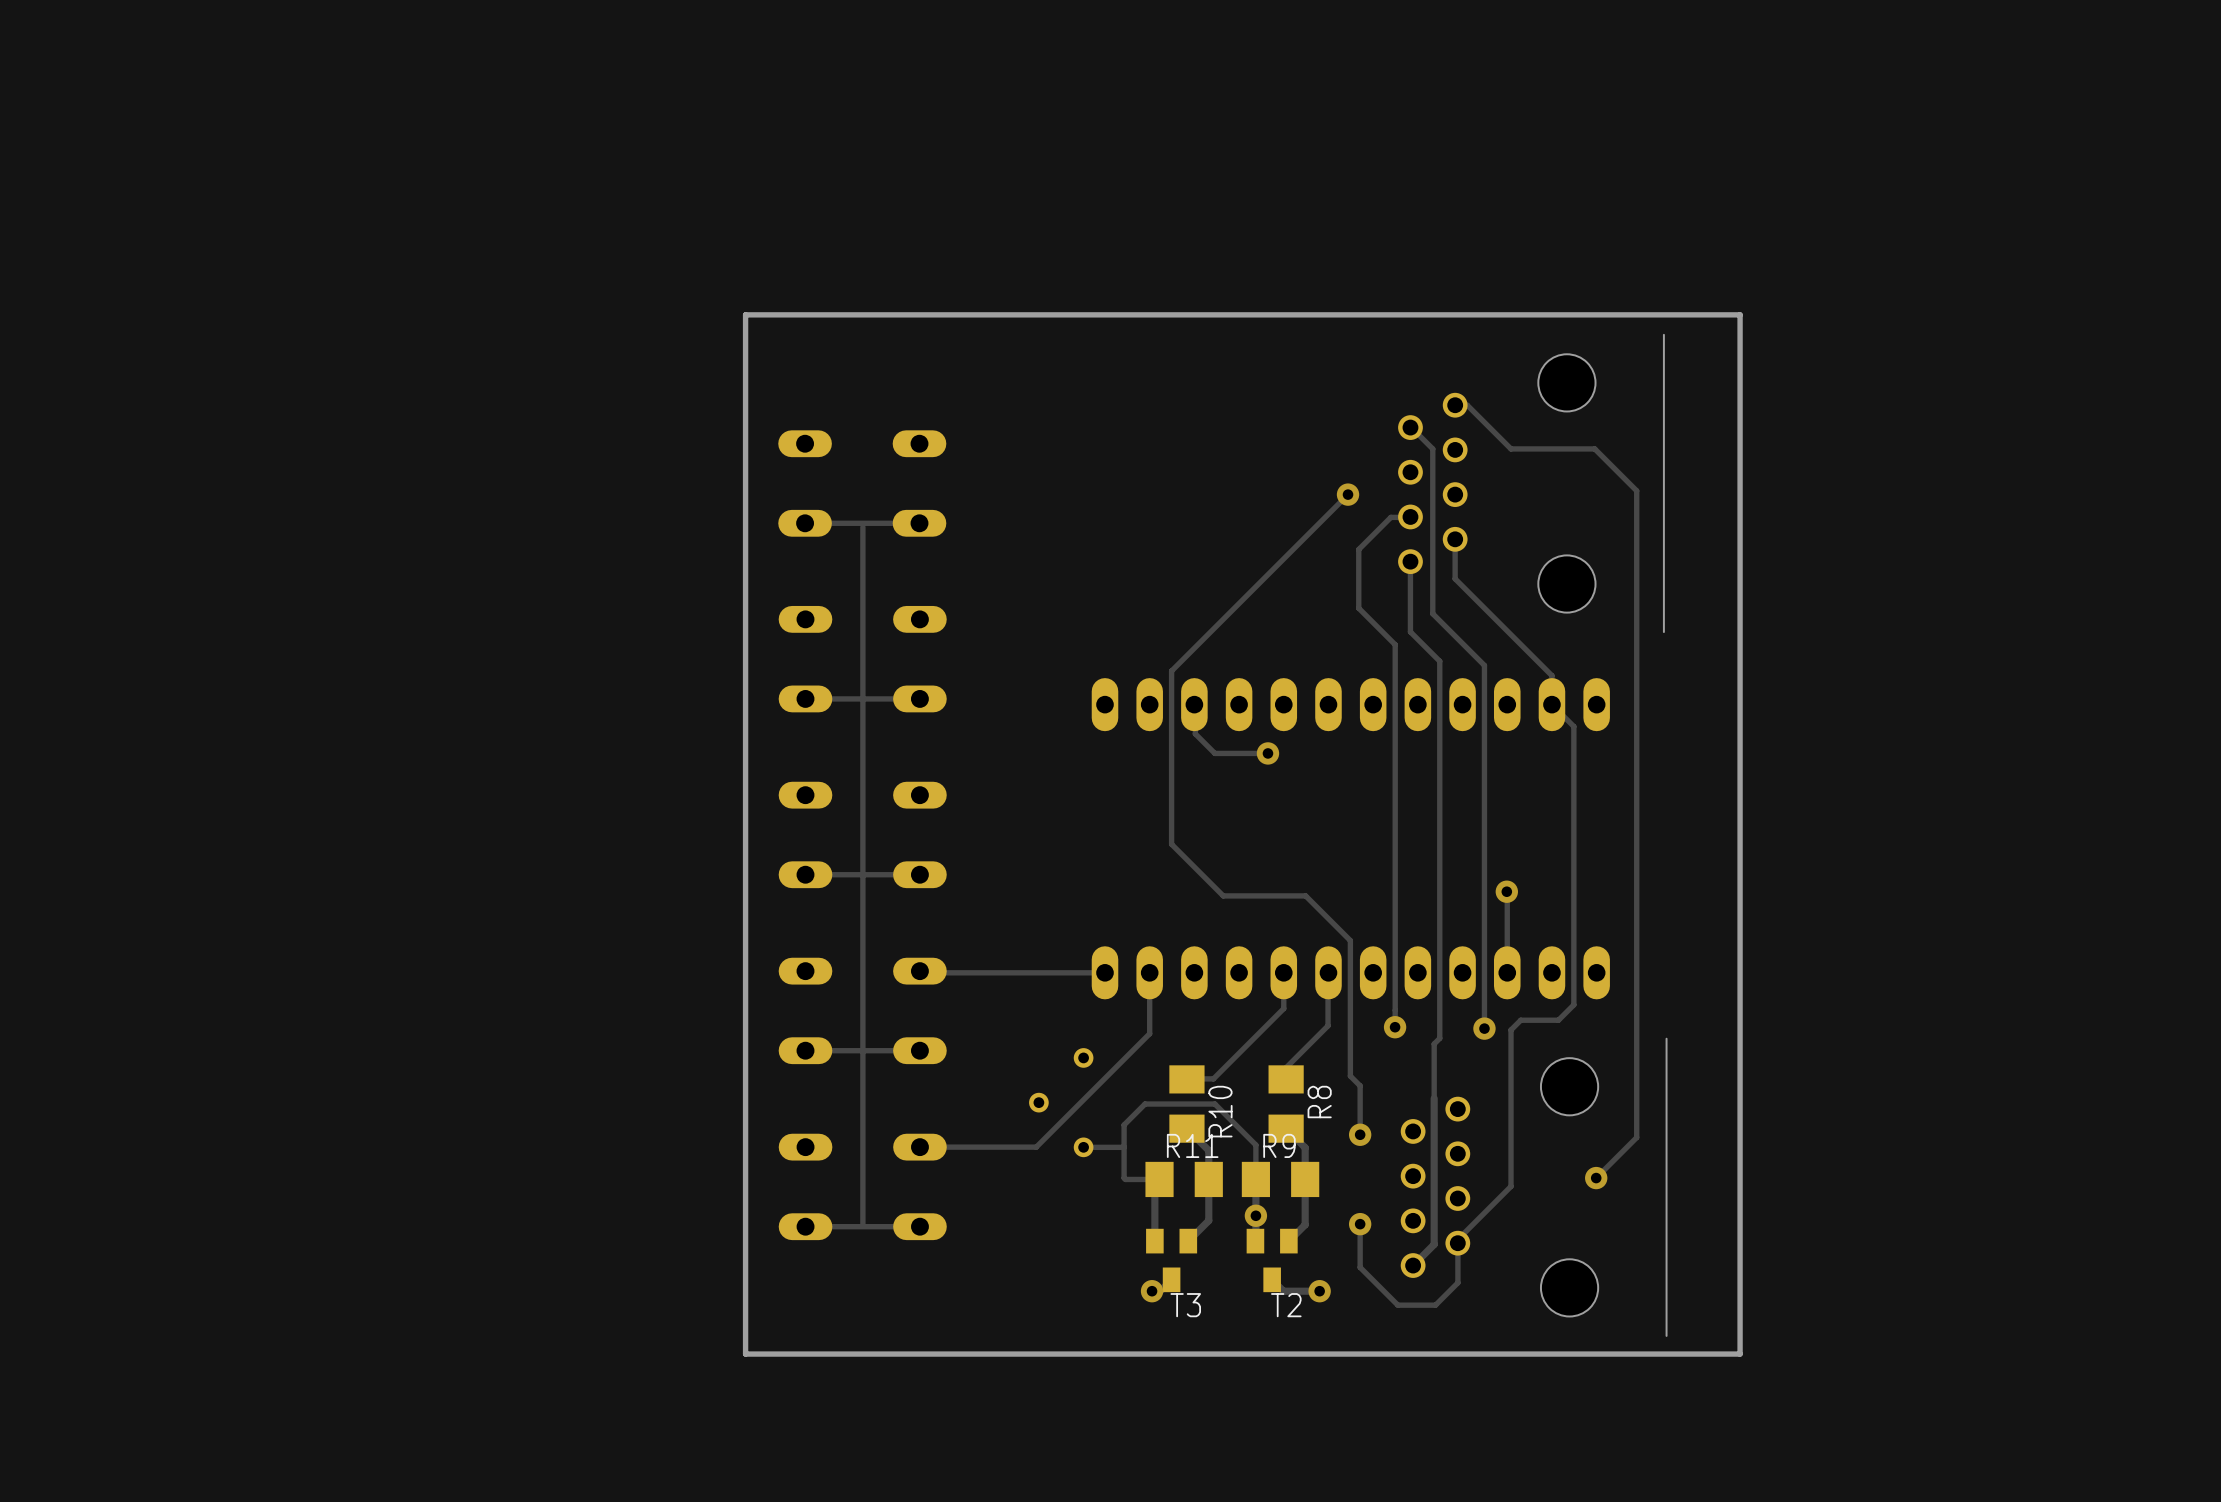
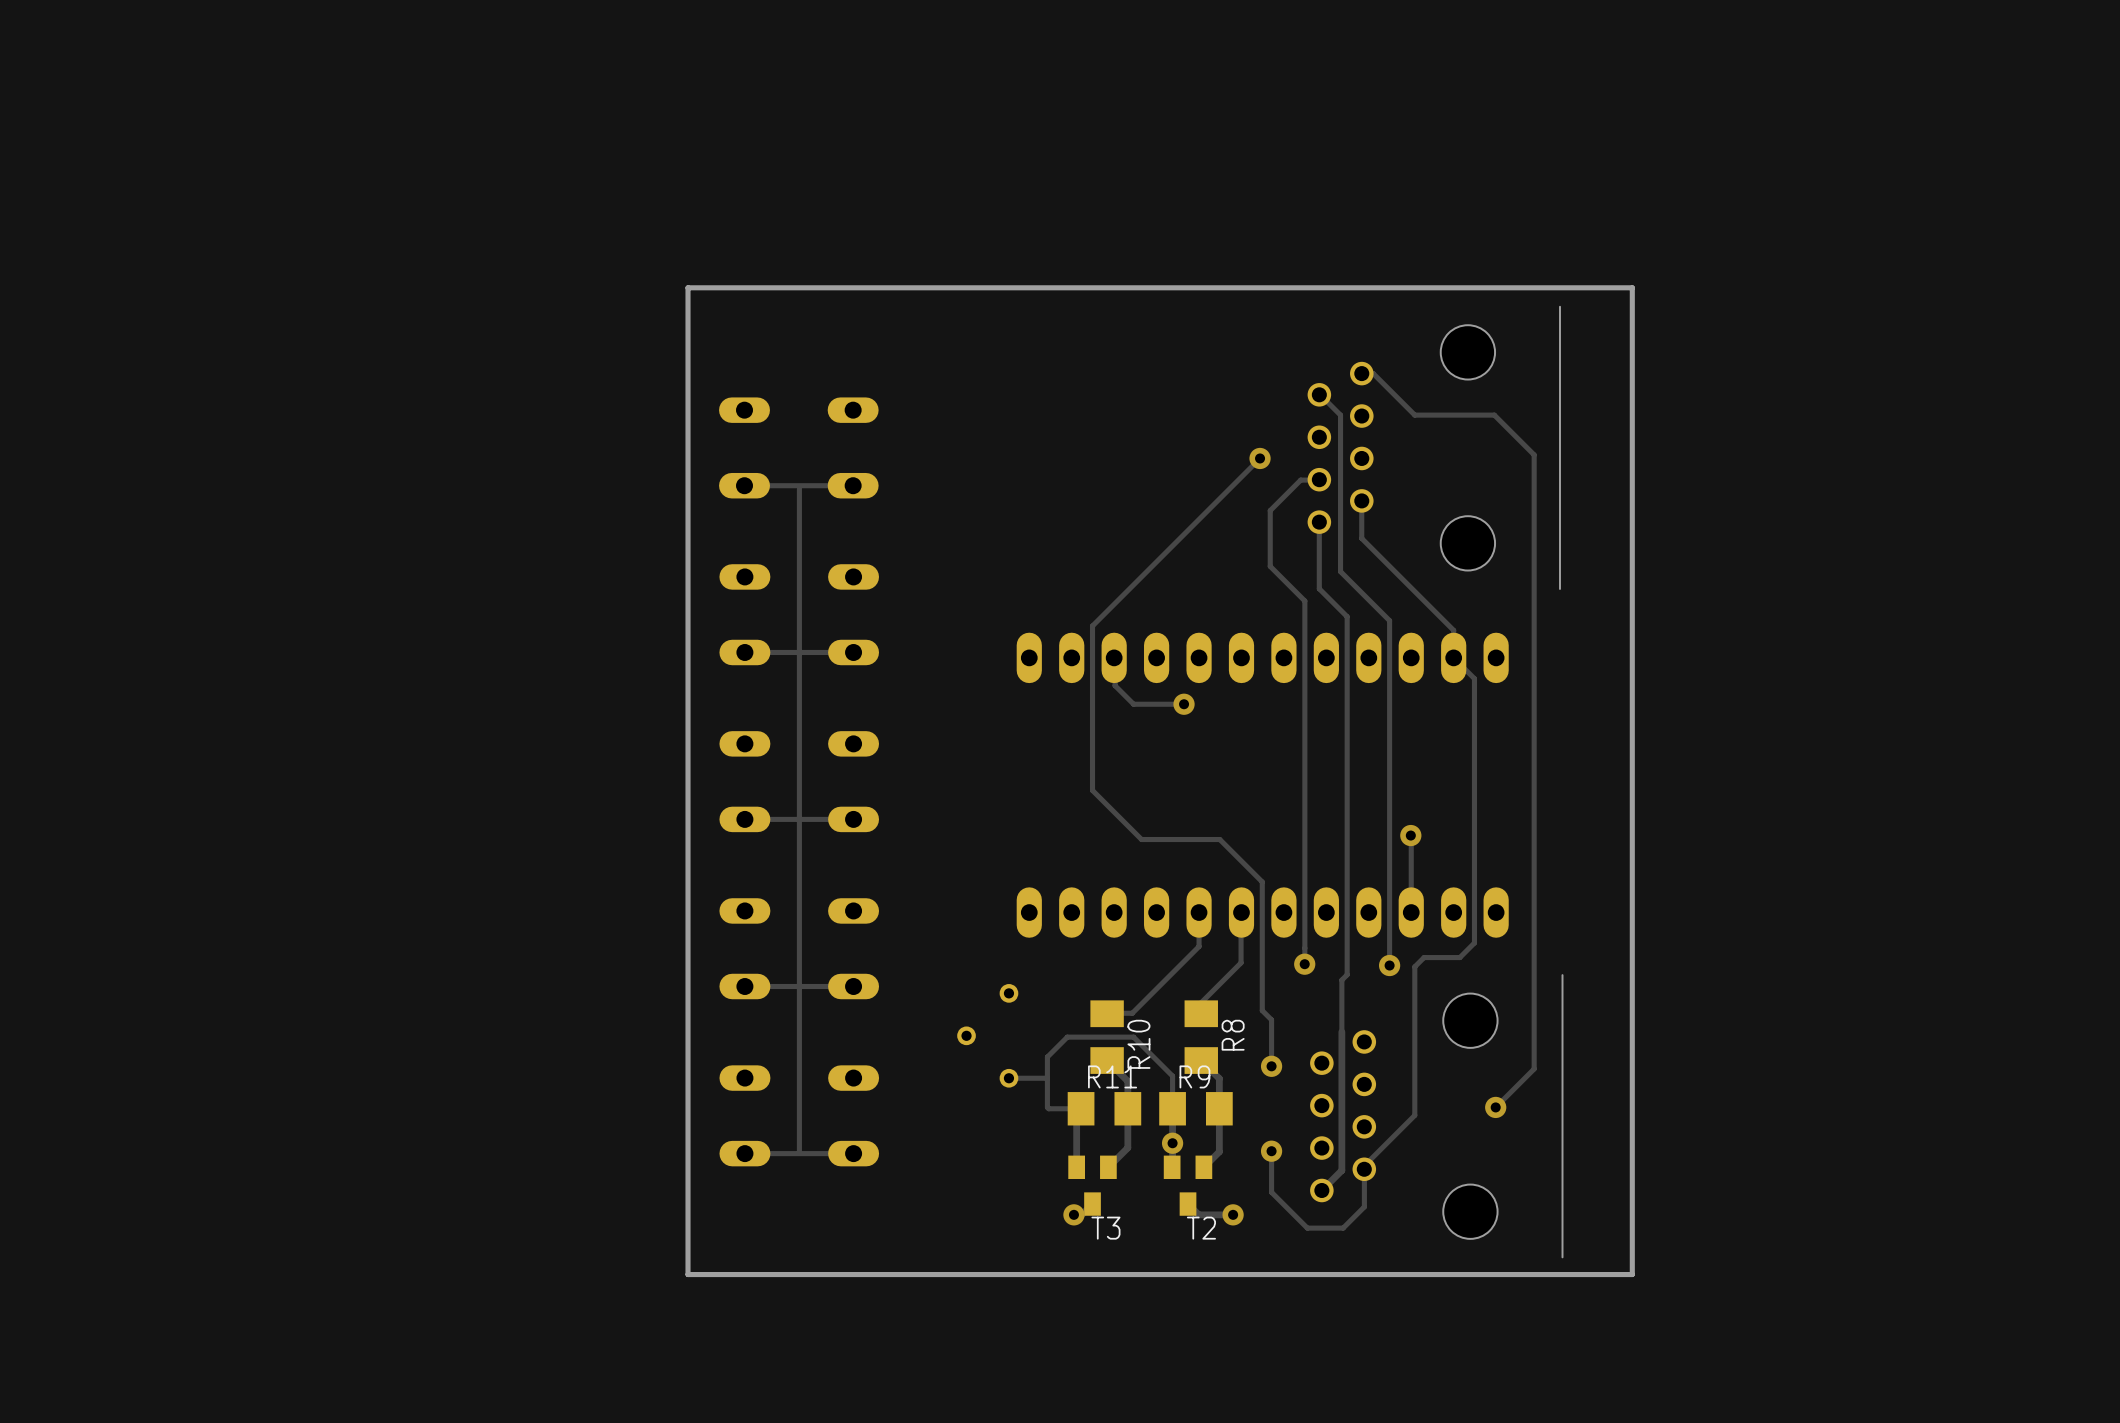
track: (919, 971) (921, 972) (1104, 972) -> none
track: (1149, 972) (1149, 1033) (1036, 1147) (919, 1147) -> none

